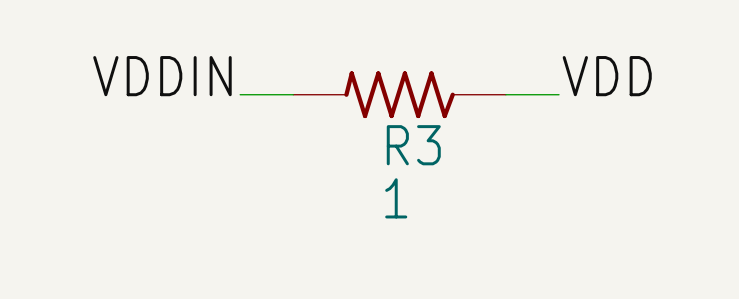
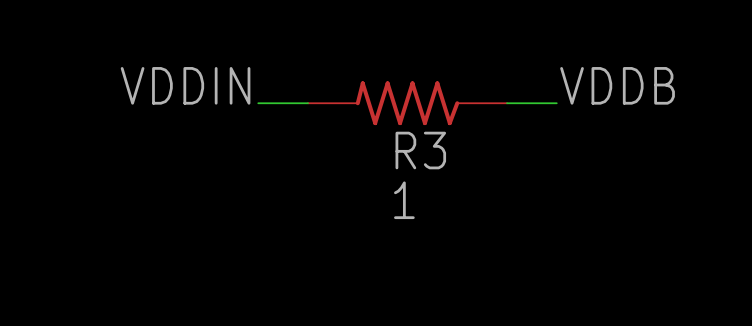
label: VDD (607, 76) -> VDDB (617, 85)

